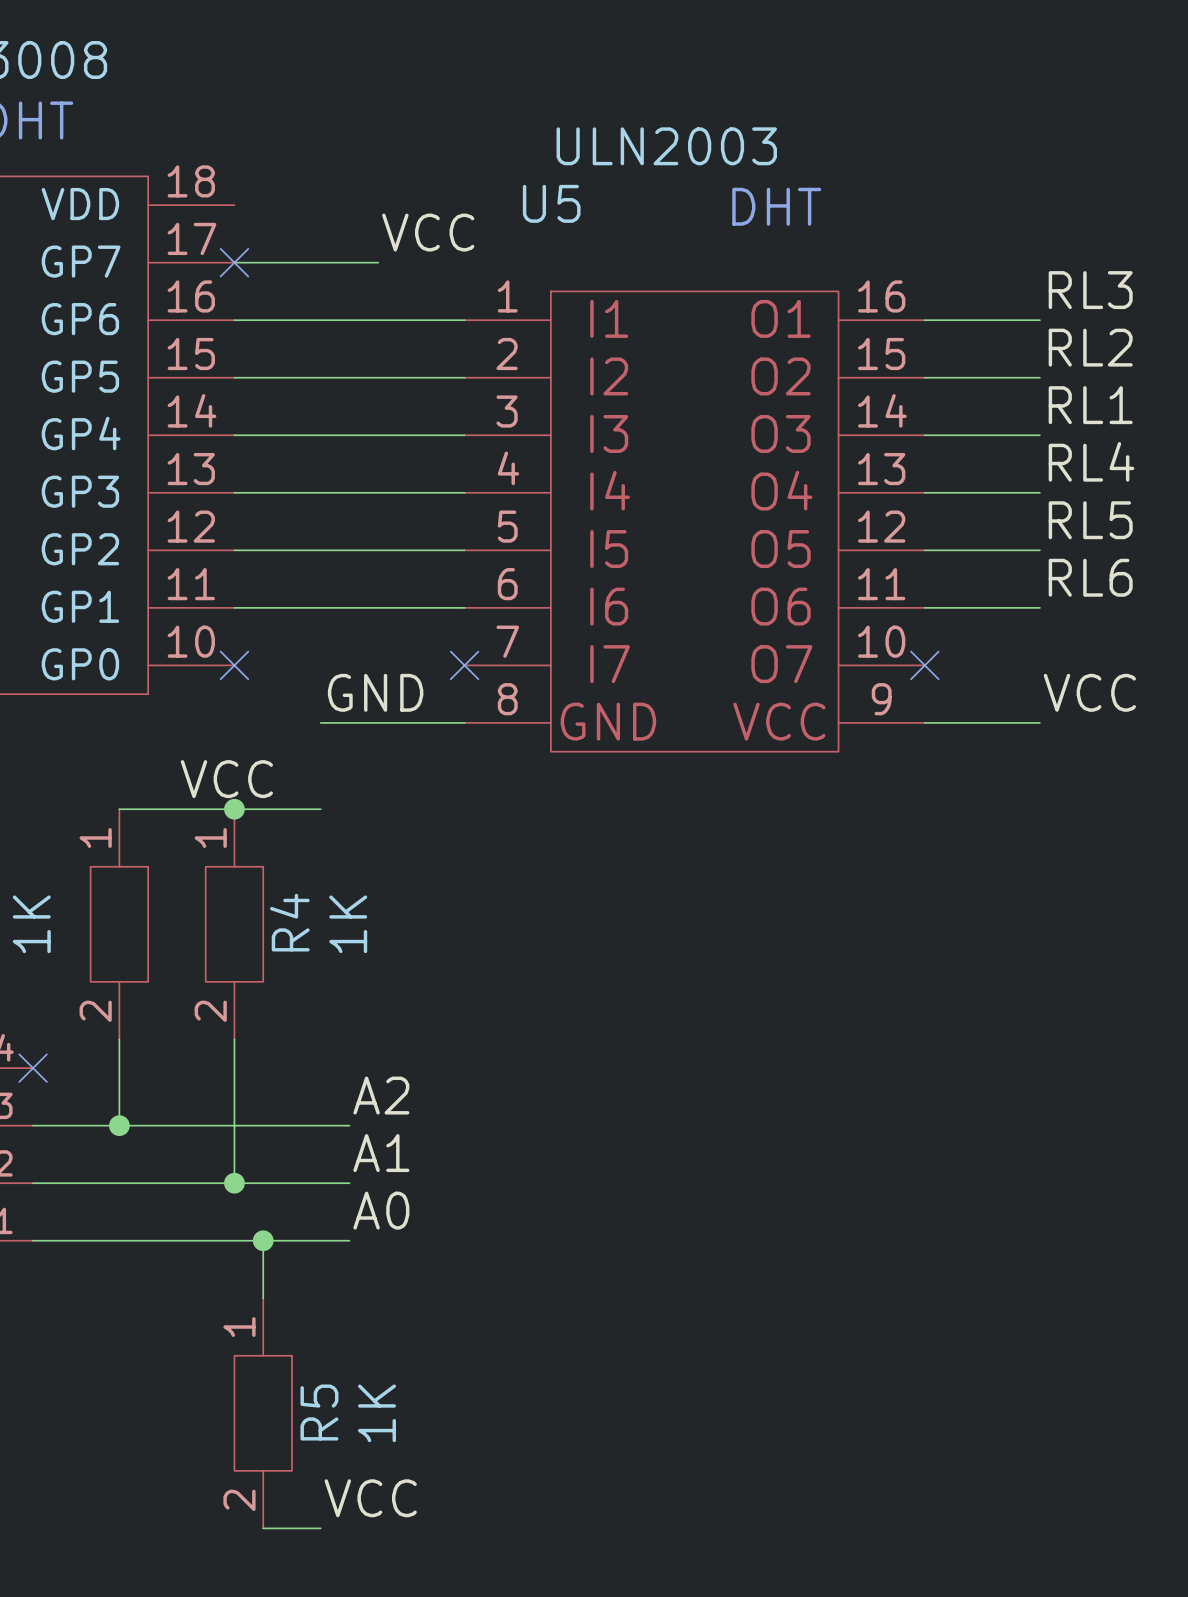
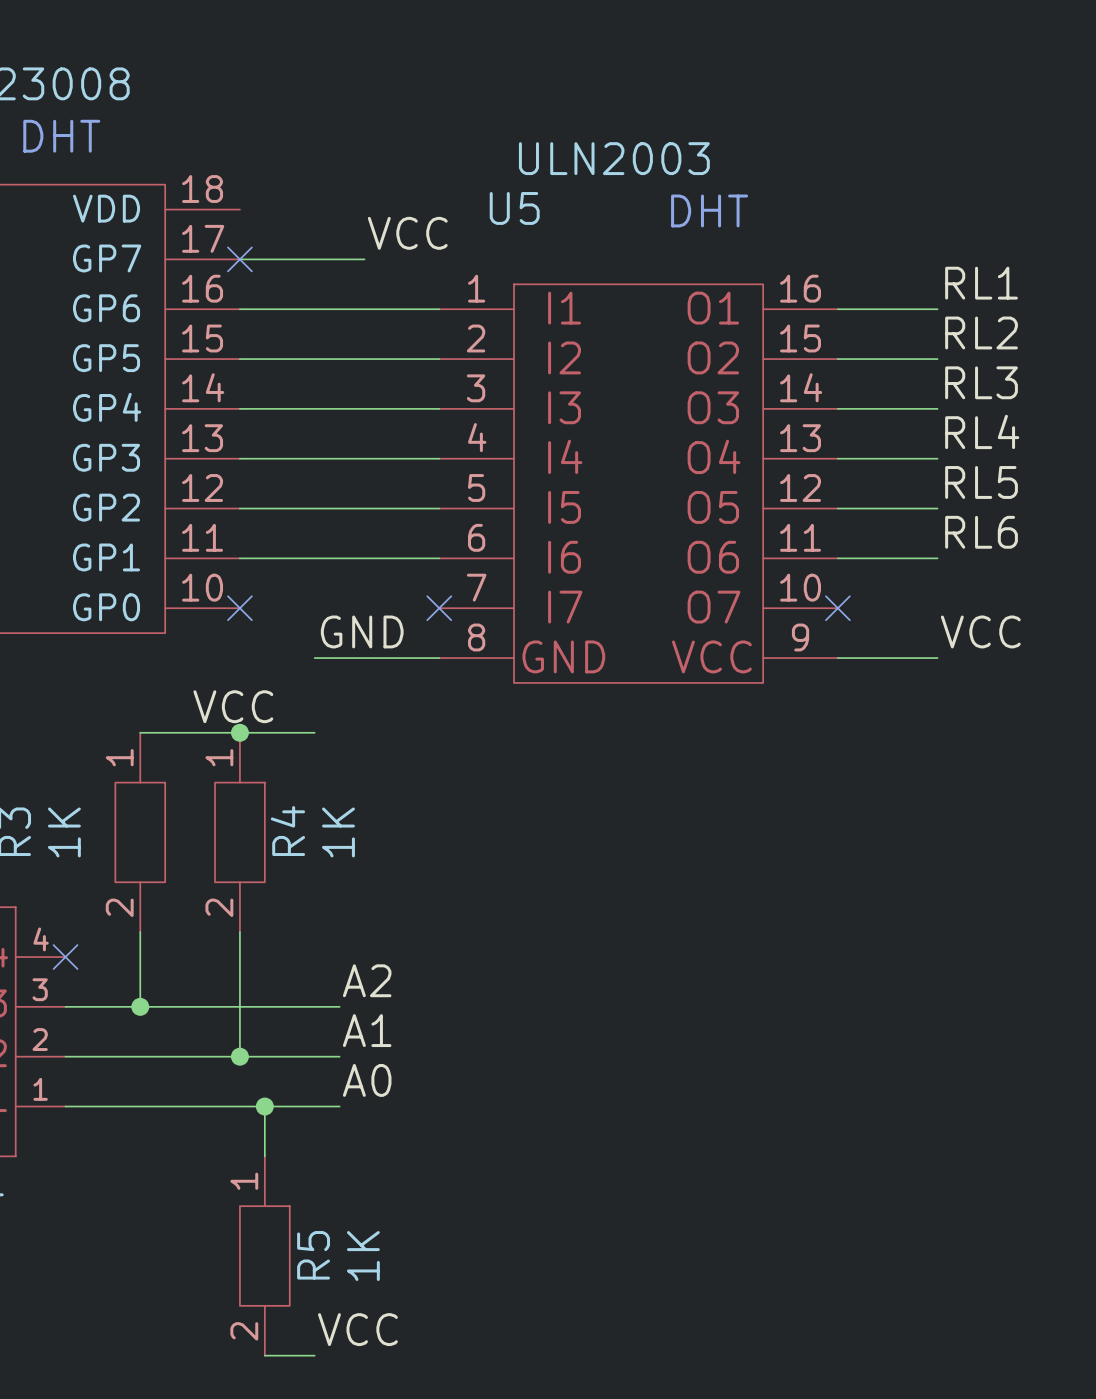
label: RL3 (1090, 290) -> RL1 (981, 283)
label: RL1 (1090, 405) -> RL3 (981, 382)

